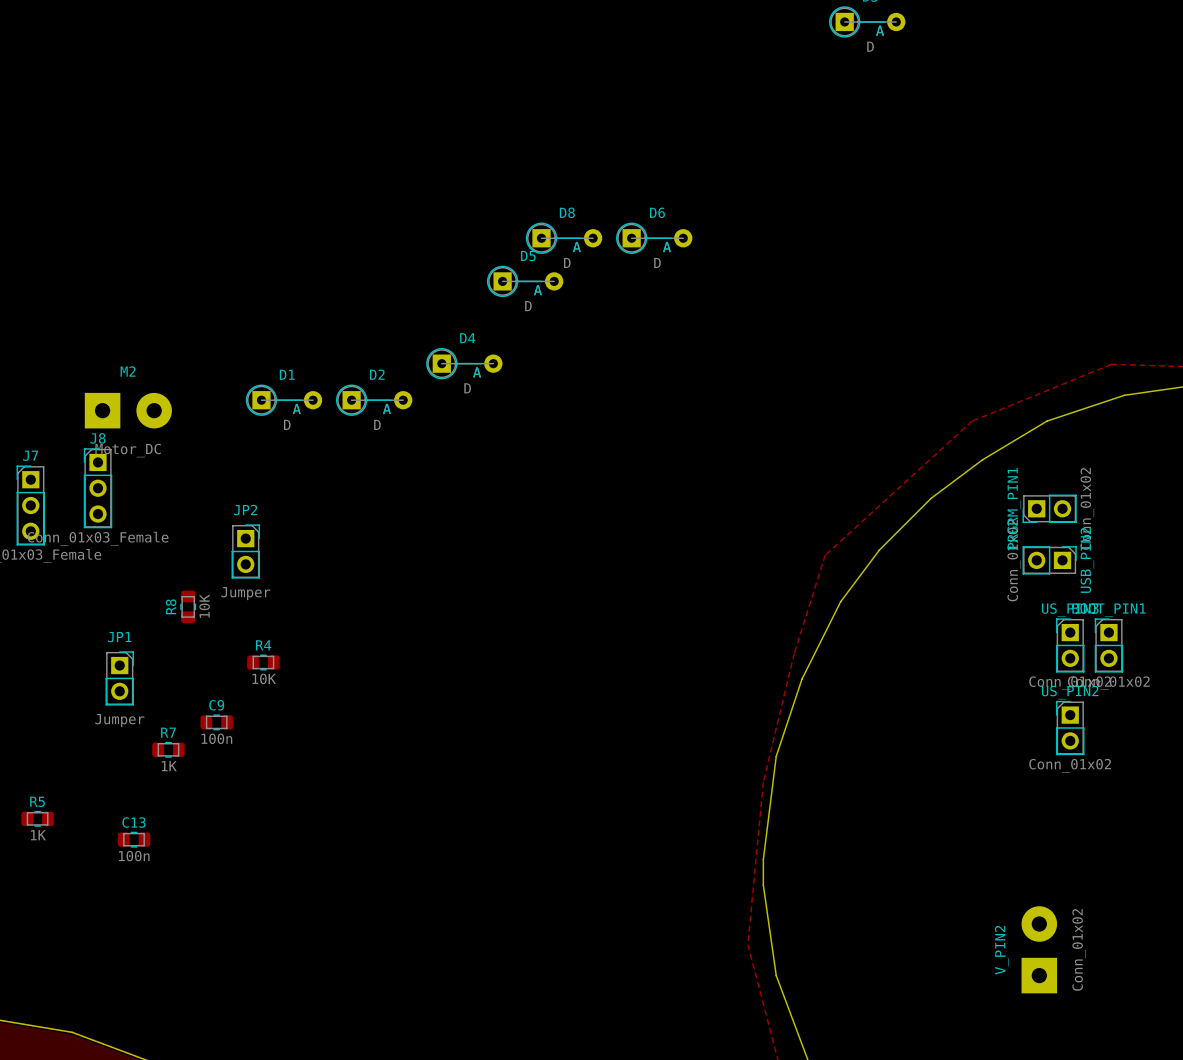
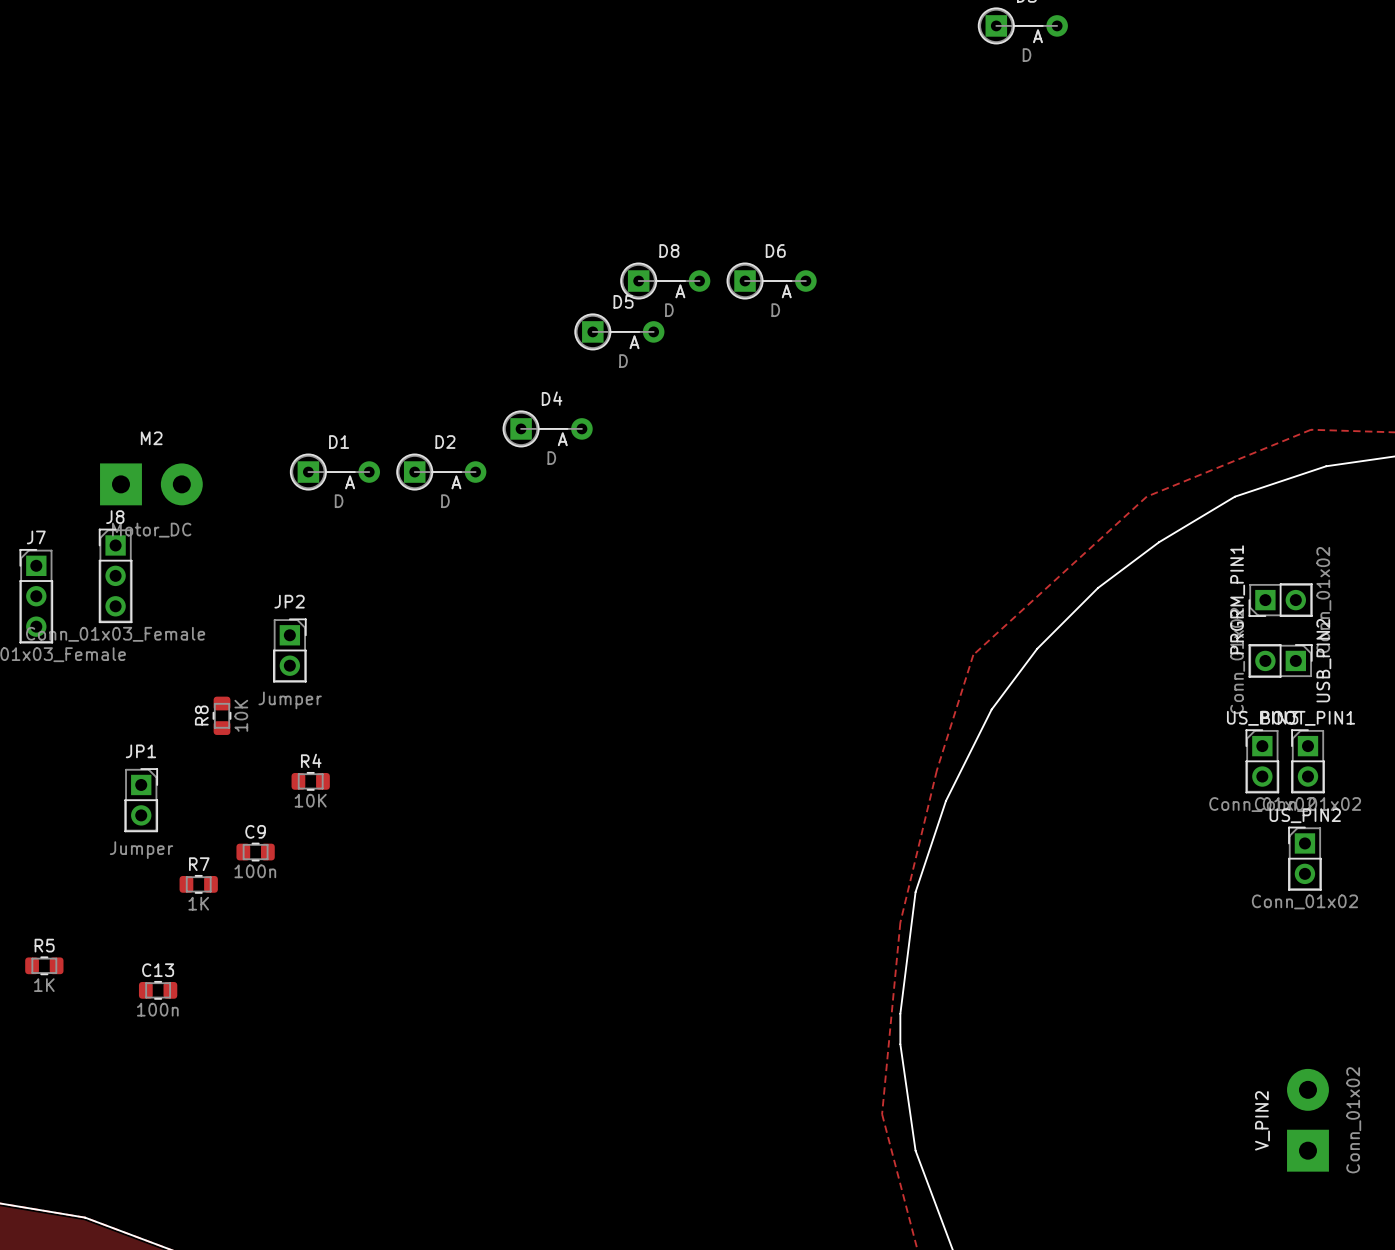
PRGRM_PIN1 position: (1049, 508) -> (1280, 600)
USB_PIN2 position: (1049, 560) -> (1280, 660)
US_PIN2 position: (1070, 728) -> (1304, 858)
V_PIN2 position: (1039, 949) -> (1307, 1120)

